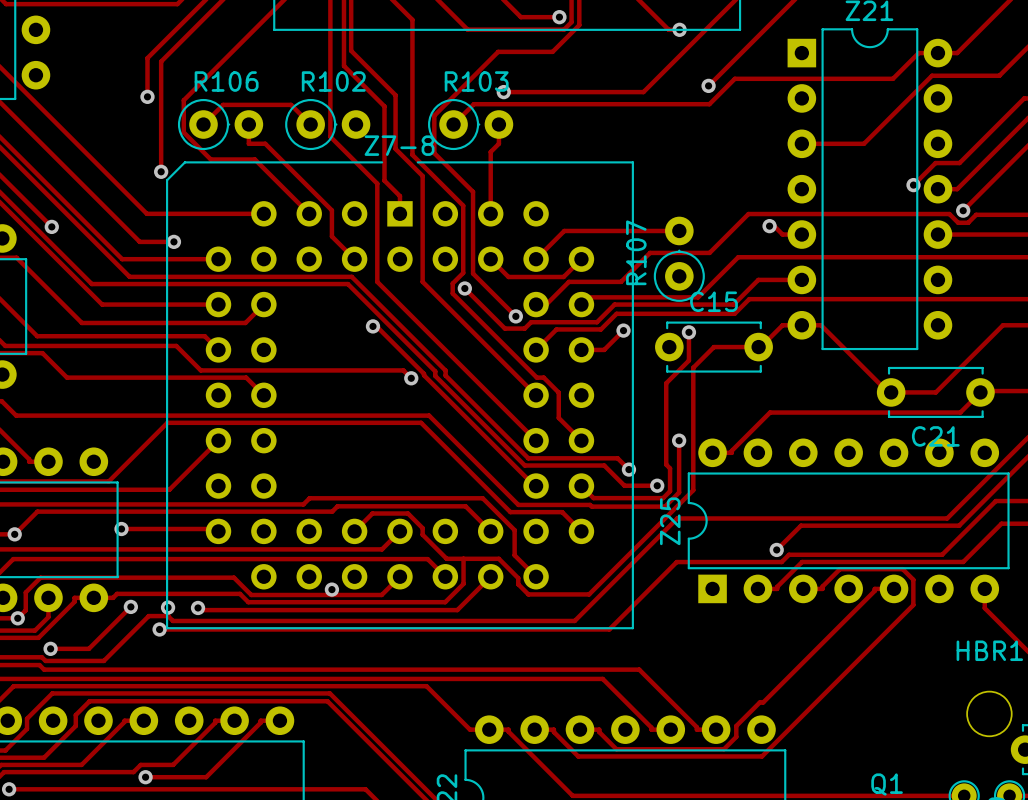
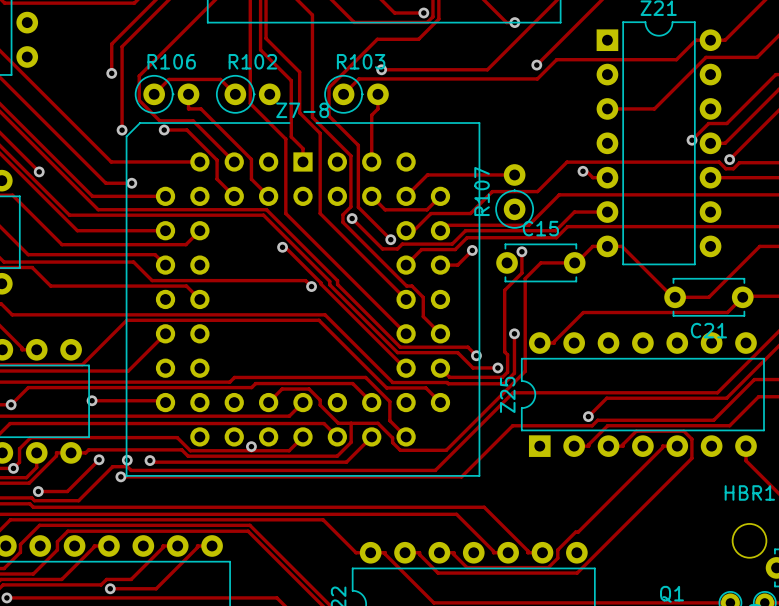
track: none -> (164, 130) (186, 130) (217, 160) (217, 179) (234, 196)
via: none -> (164, 130)

